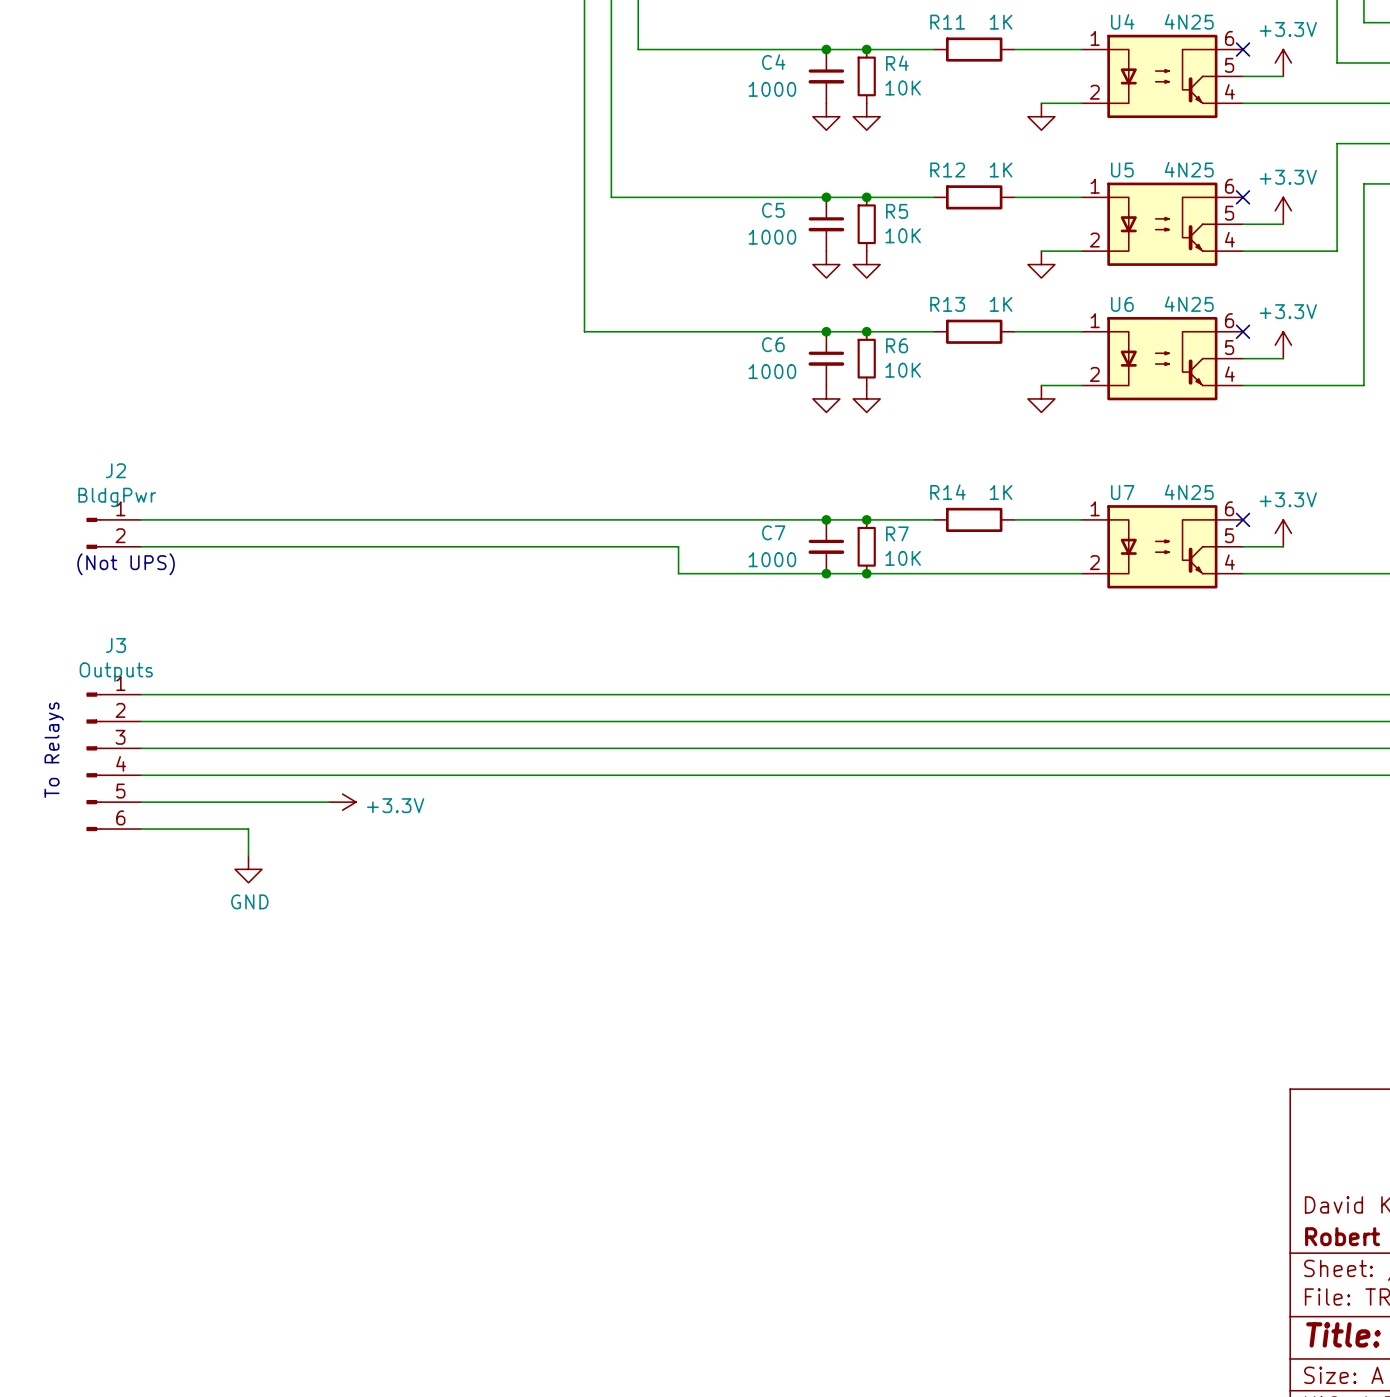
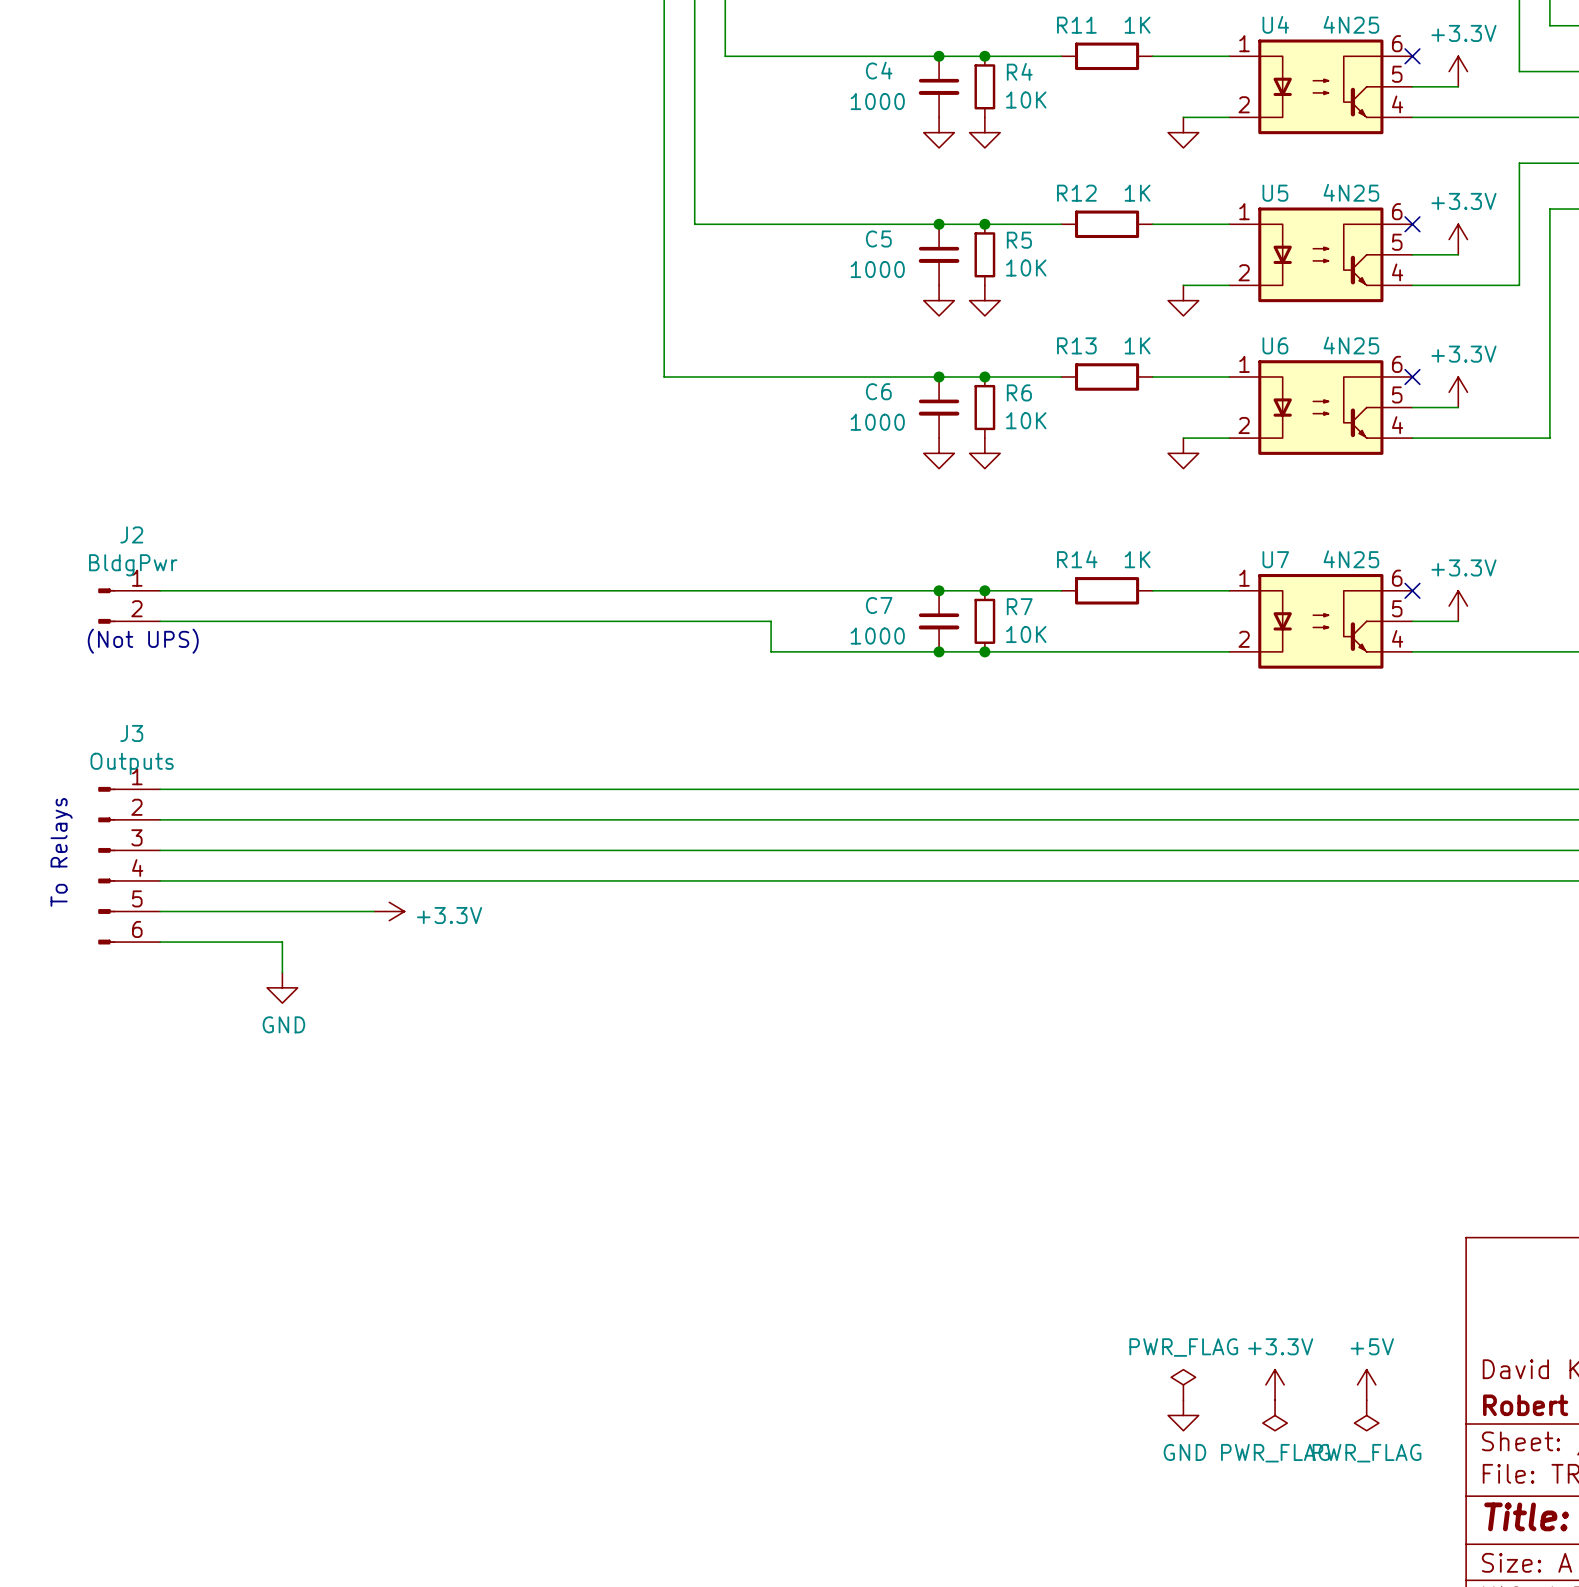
power symbol: none -> PWR_FLAG (1183, 1384)
power symbol: none -> +3.3V (1275, 1384)
power symbol: none -> +5V (1366, 1384)
power symbol: none -> GND (1183, 1415)
power symbol: none -> PWR_FLAG (1275, 1415)
power symbol: none -> PWR_FLAG (1366, 1415)

